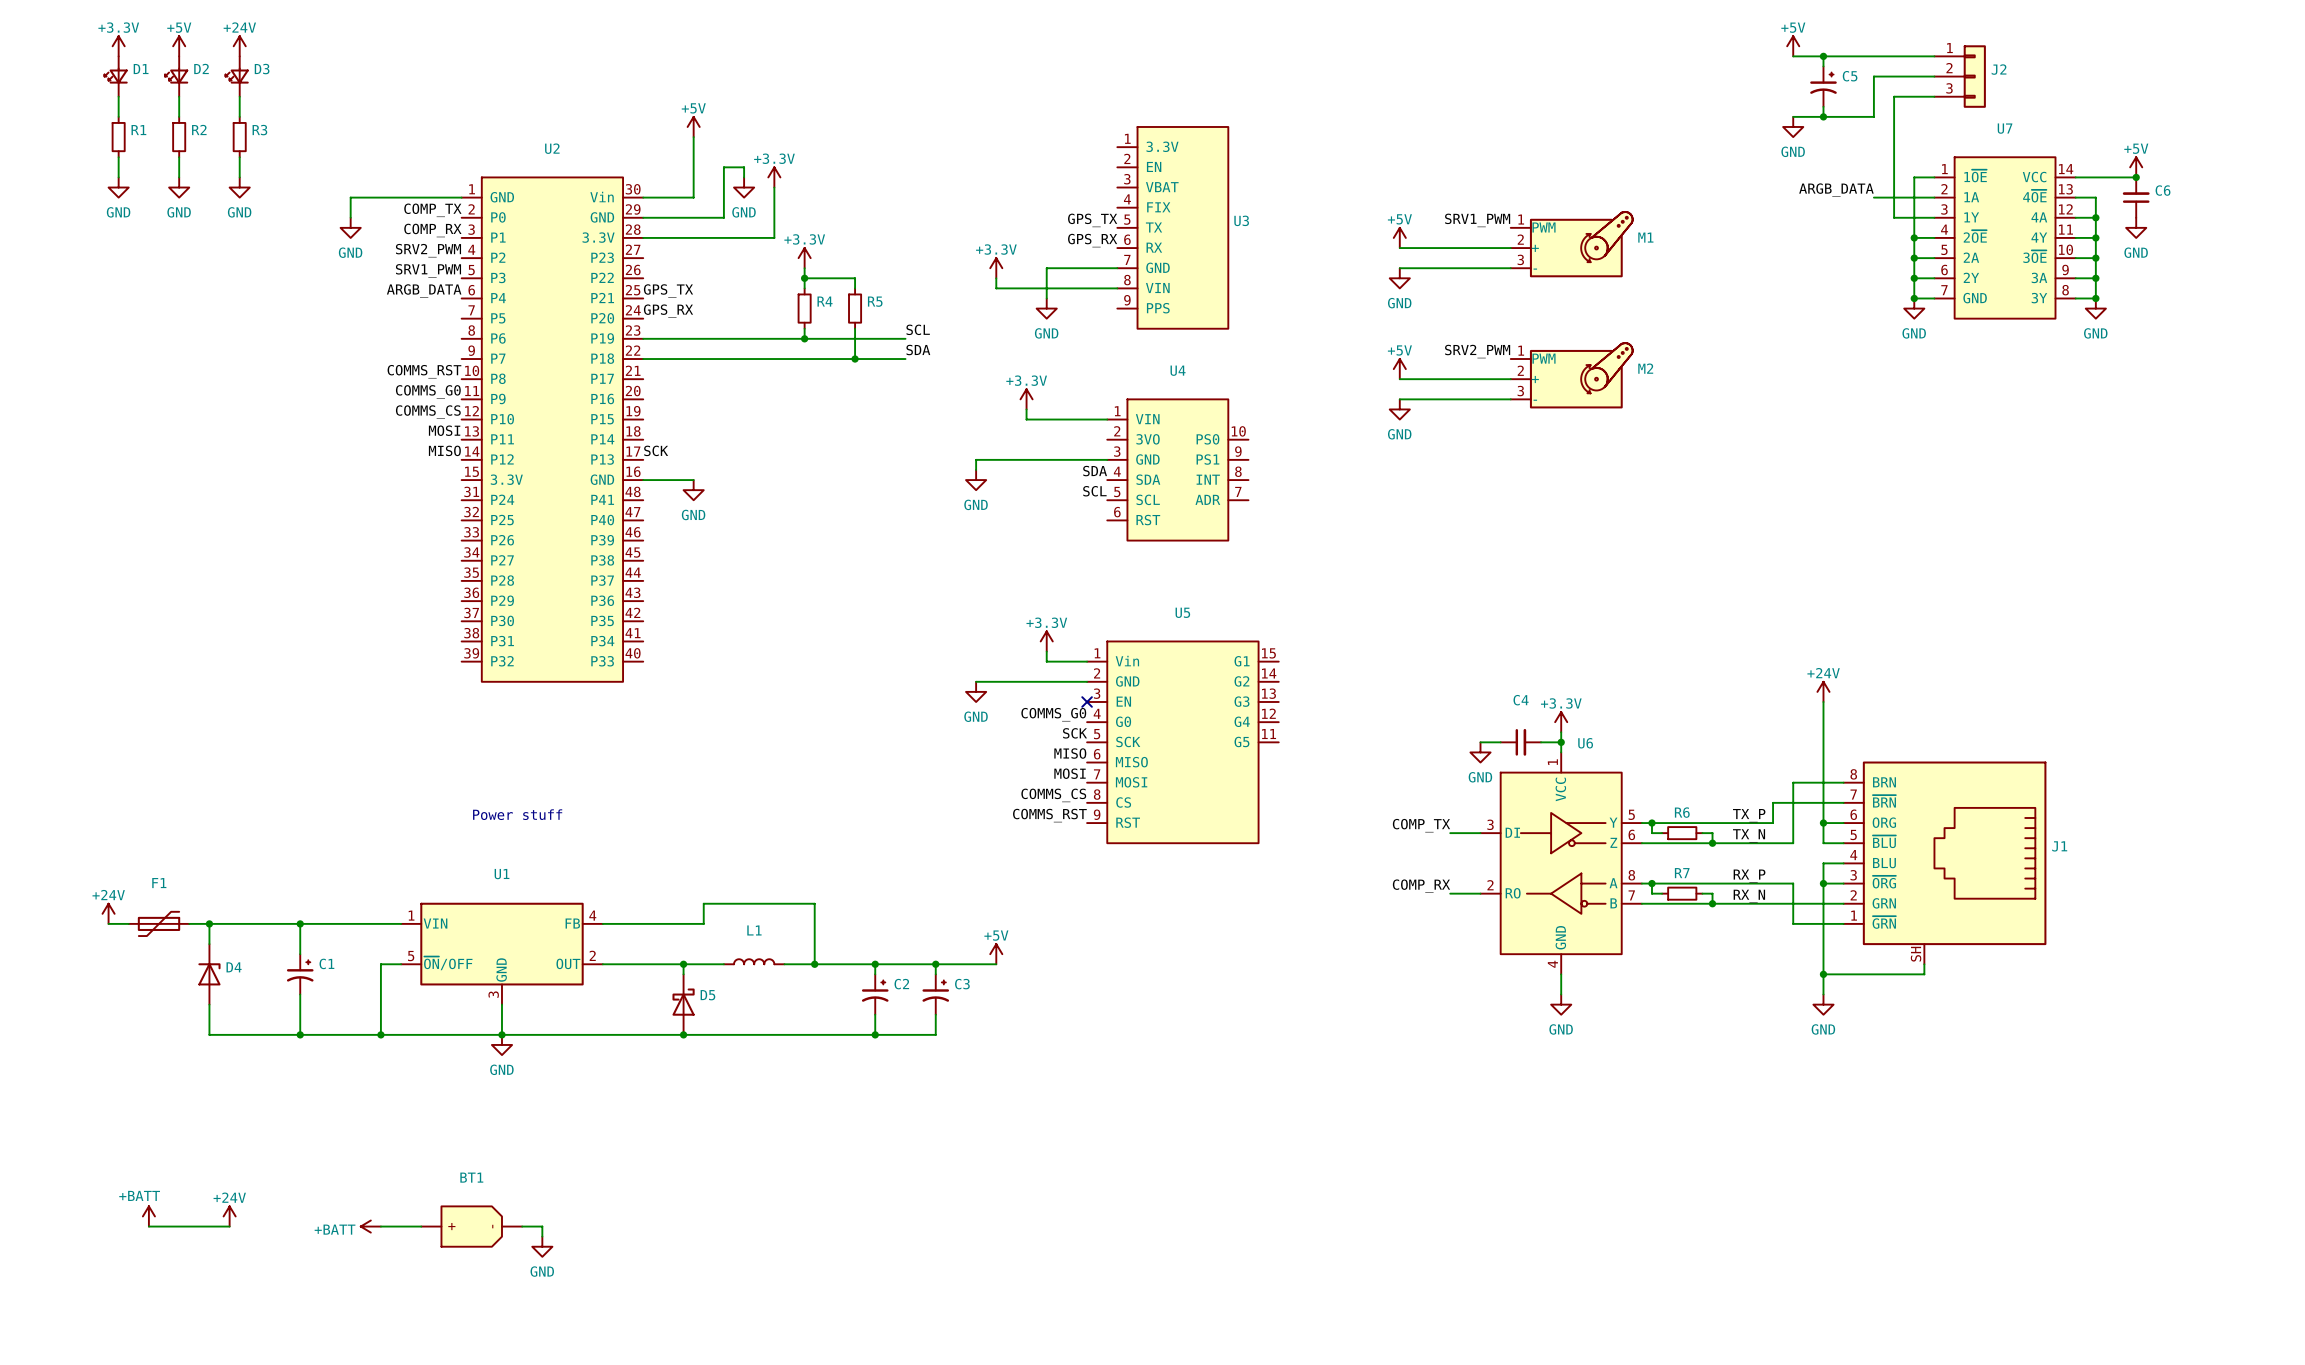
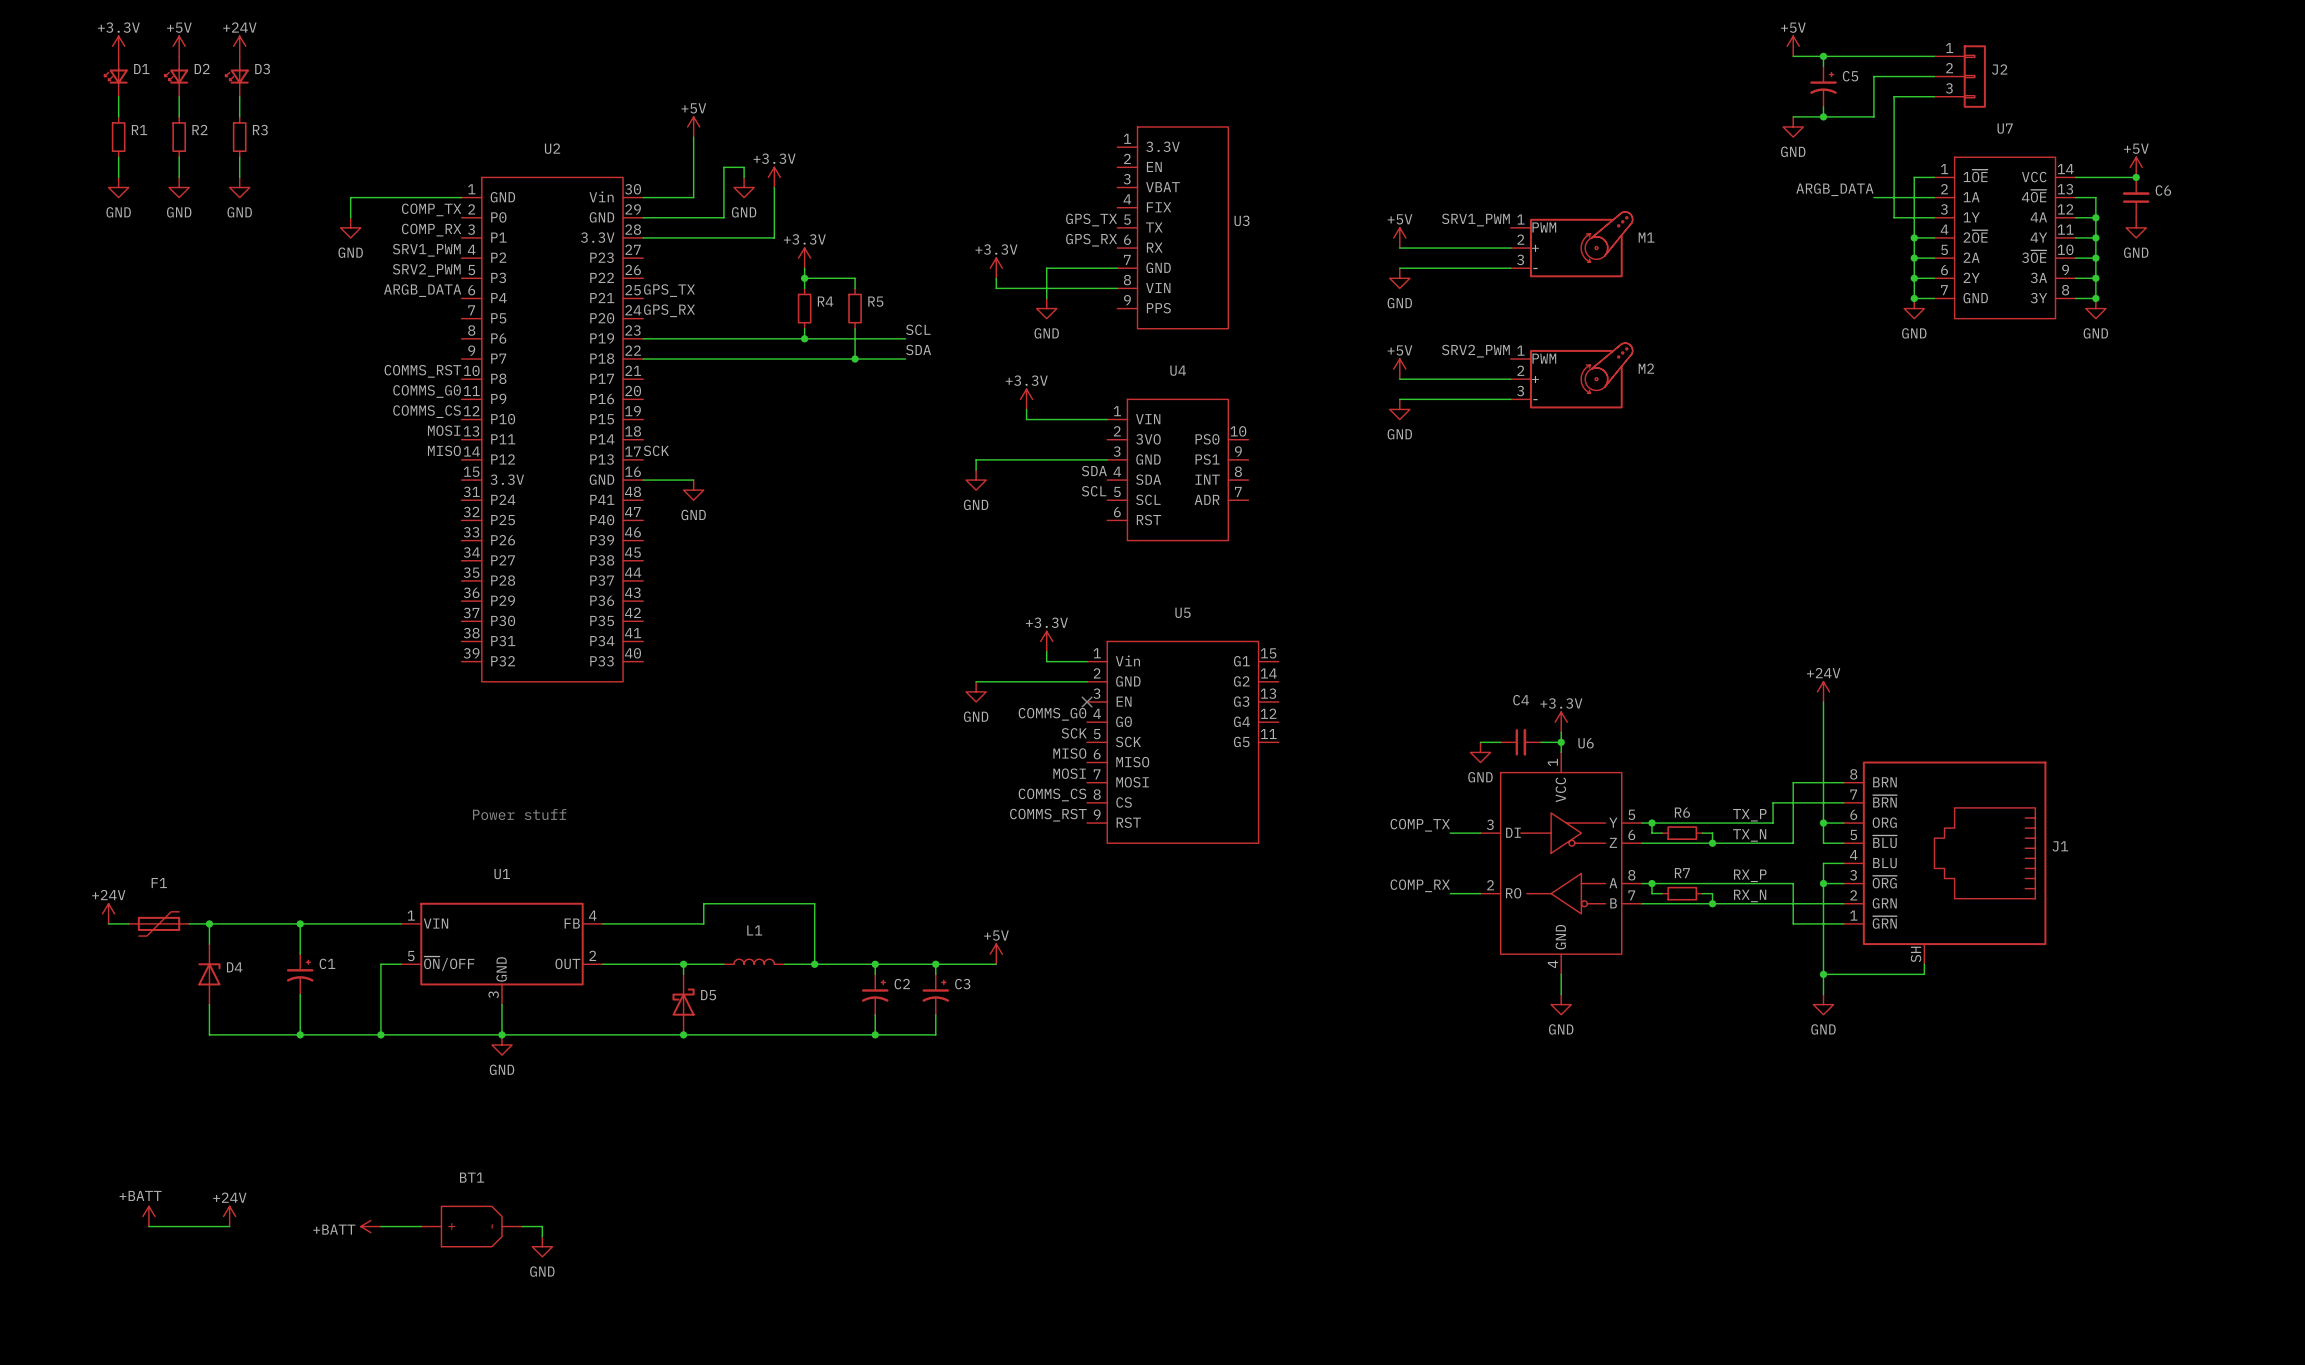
label: SRV2_PWM (428, 250) -> SRV1_PWM (426, 250)
label: SRV1_PWM (428, 270) -> SRV2_PWM (426, 270)

